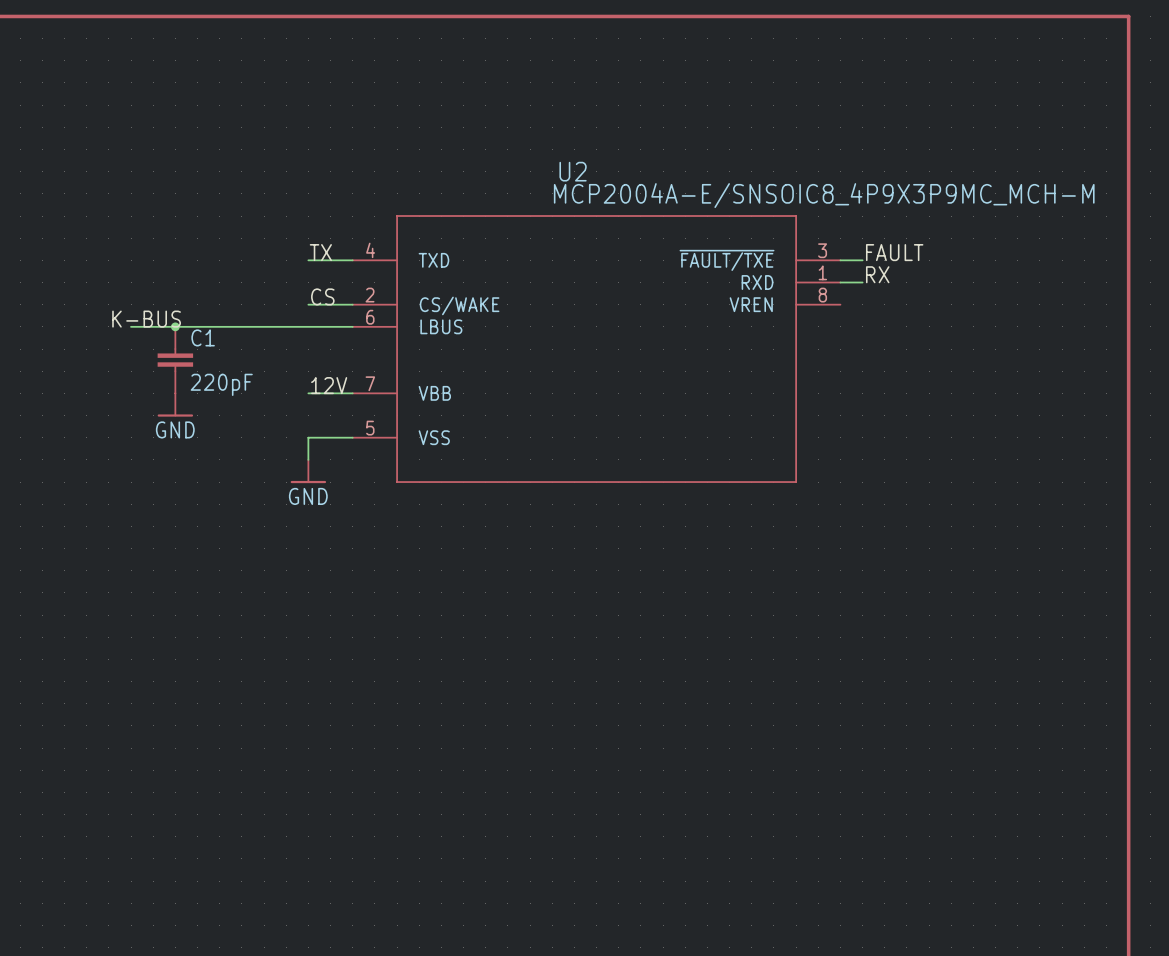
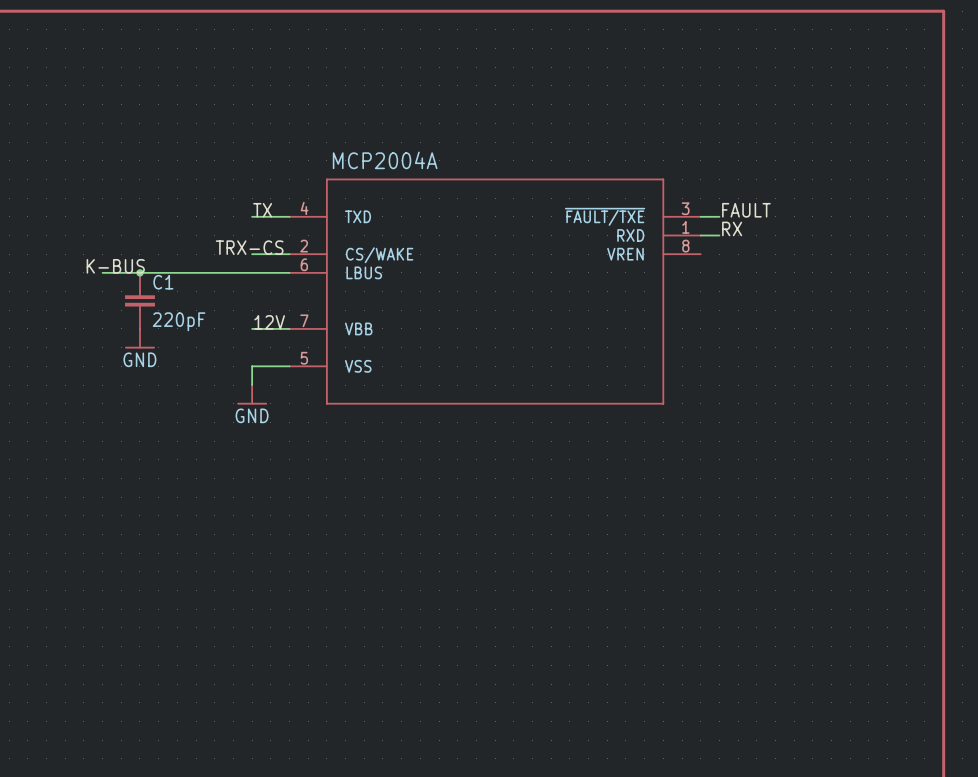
U2 name: U2 (573, 171) -> MCP2004A (385, 160)
U2 value: MCP2004A-E/SNSOIC8_4P9X3P9MC_MCH-M (824, 195) -> none
label: none -> TRX-CS (249, 247)
label: CS (322, 296) -> none

